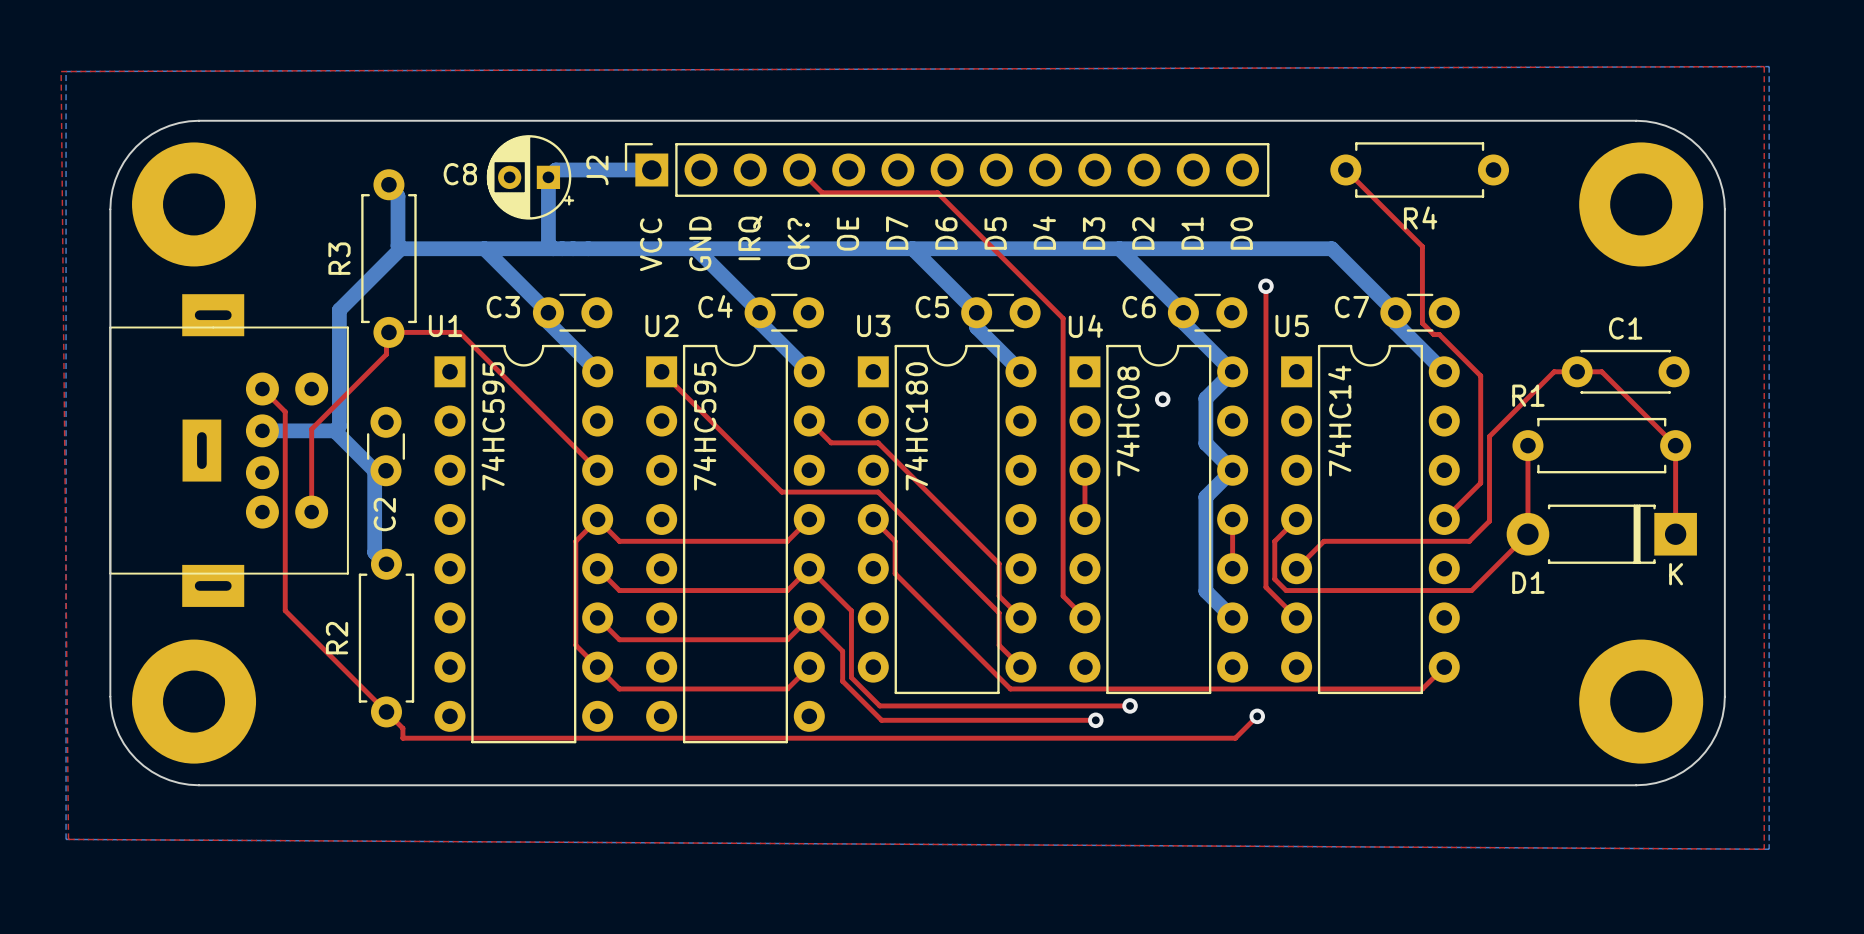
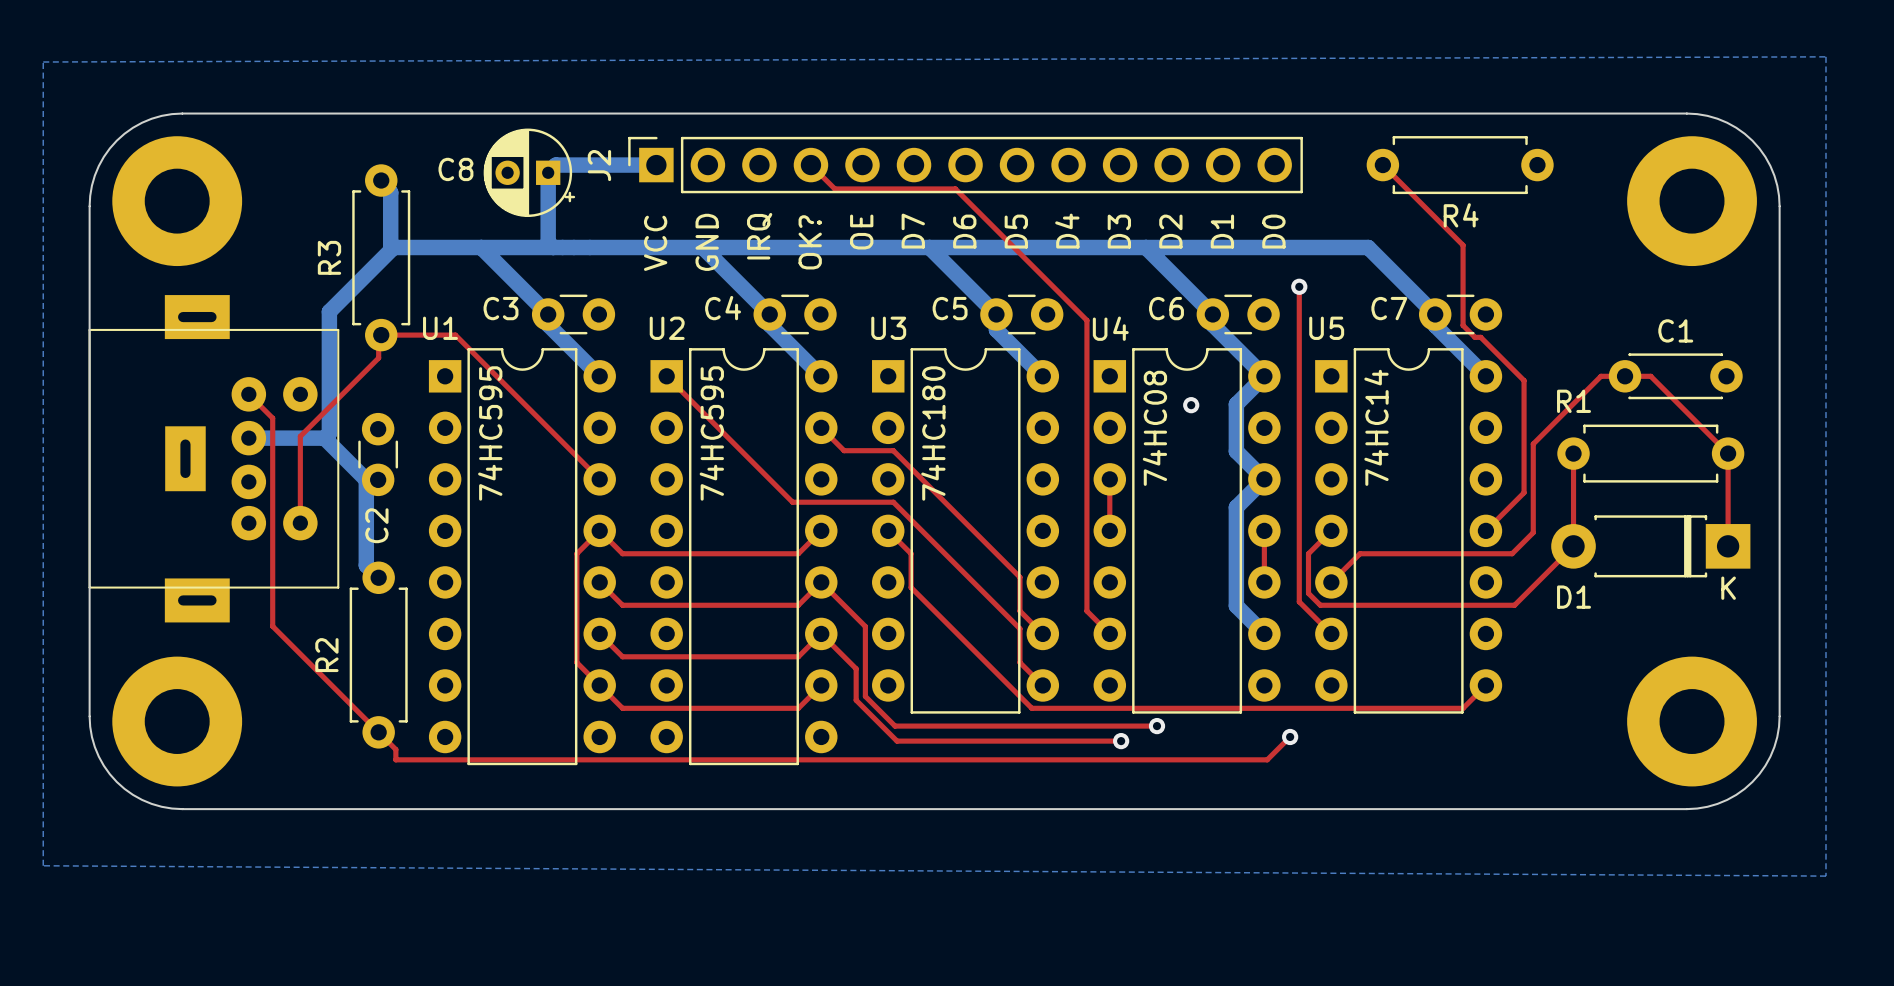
top zone outline: (1764, 66) (61, 71) (68, 839) (1764, 849) (1764, 66) -> none

